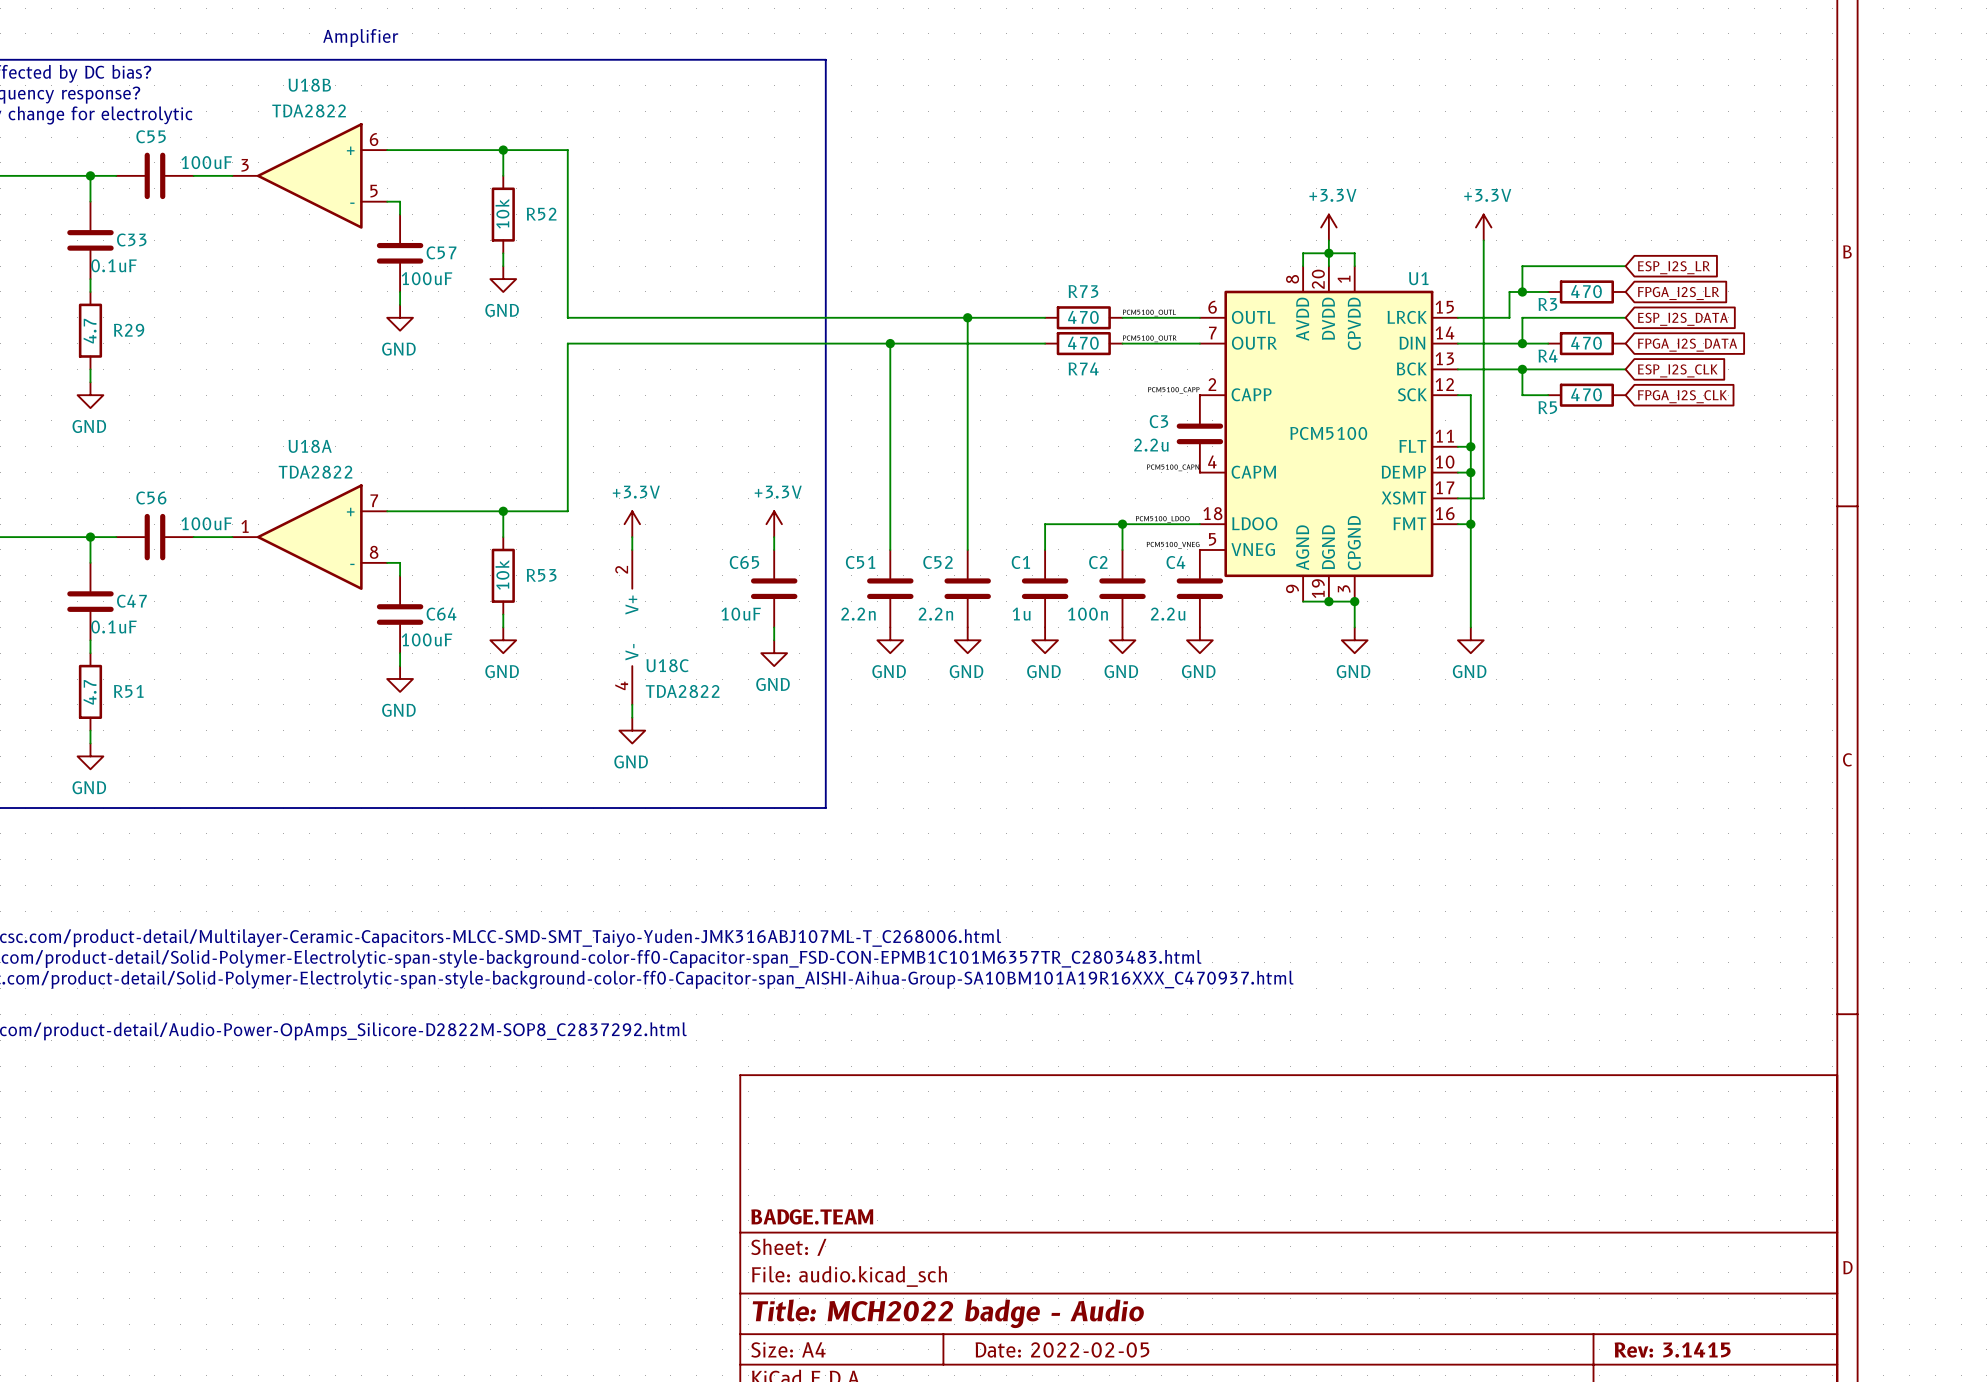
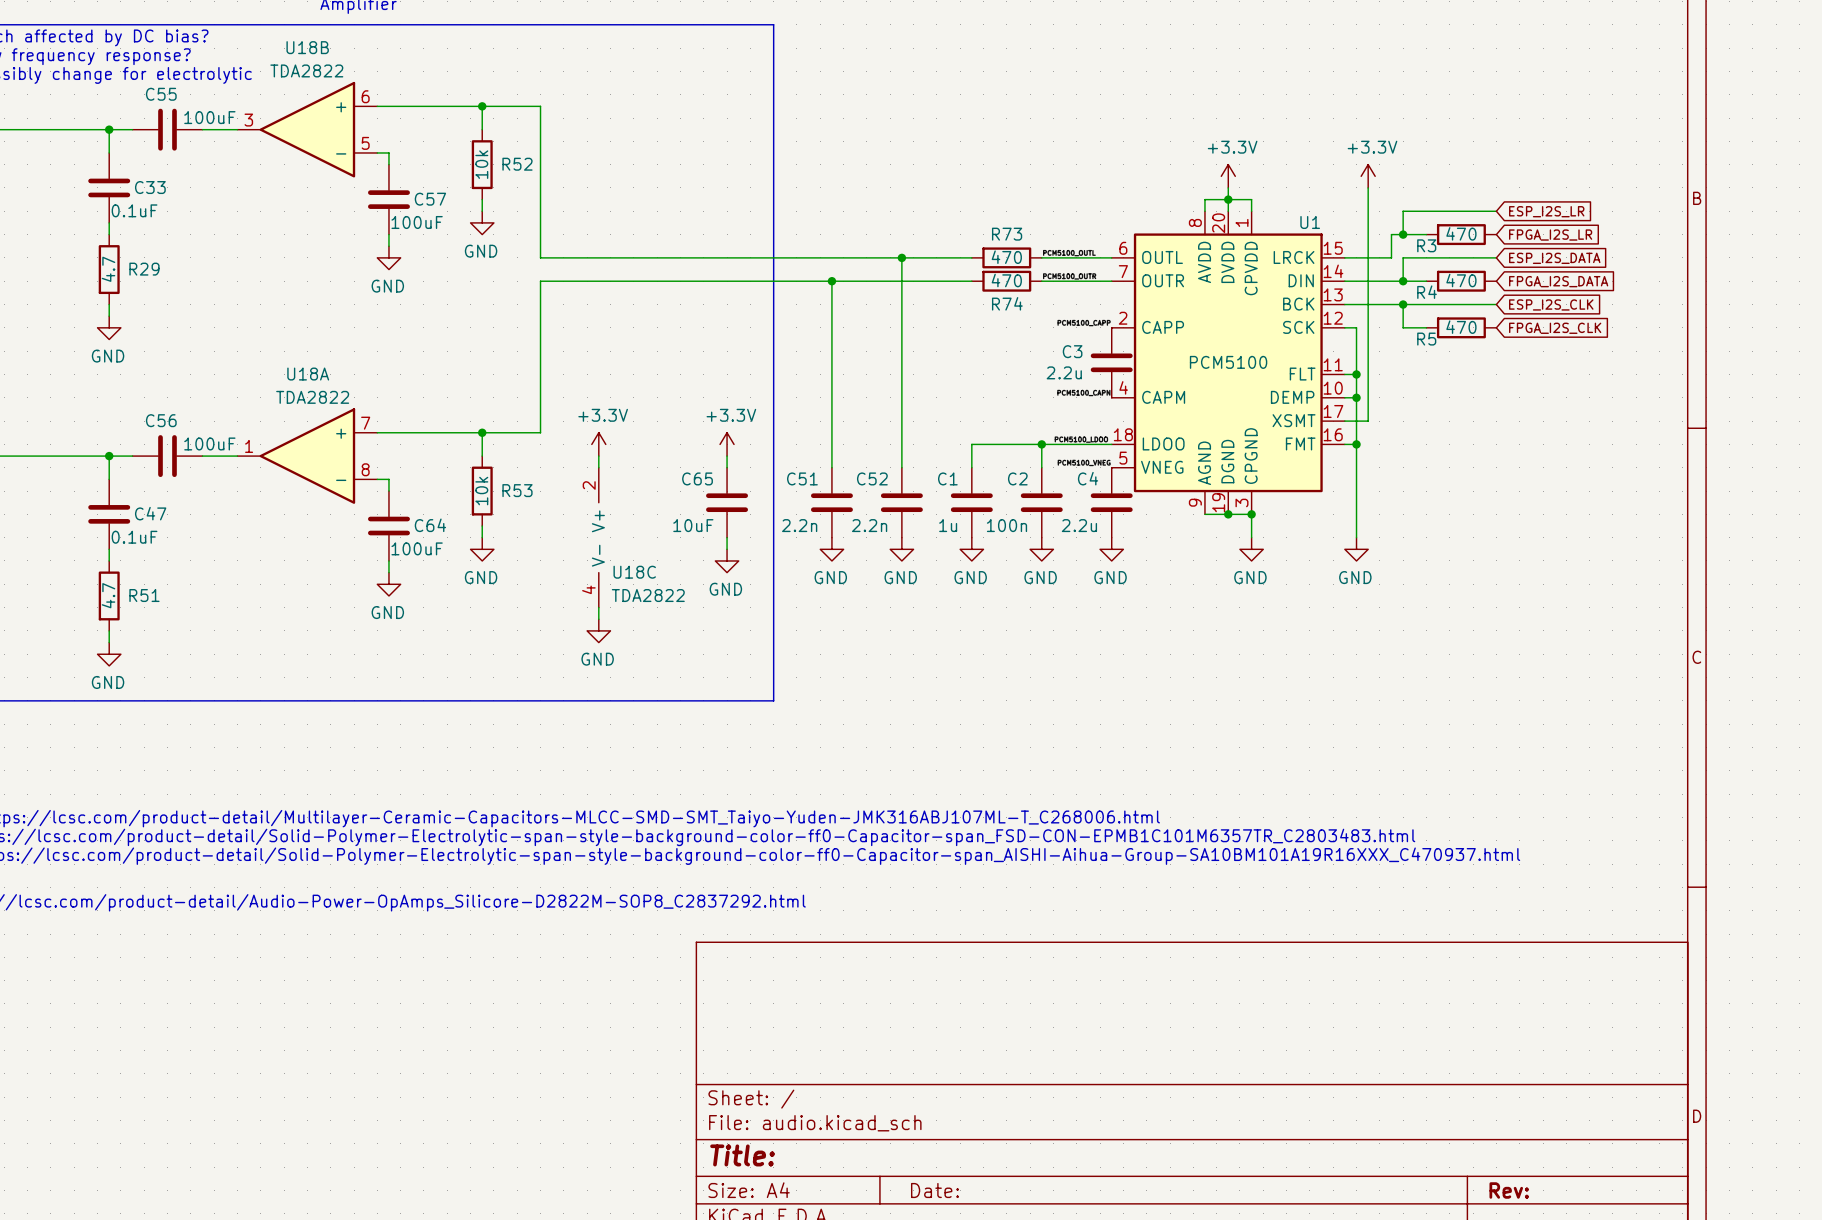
title block: BADGE.TEAM (812, 1216) -> none
title block: Title: MCH2022 badge - Audio (948, 1313) -> Title: (742, 1155)
title block: Date: 2022-02-05 (1062, 1349) -> Date: (934, 1190)
title block: Rev: 3.1415 (1672, 1349) -> Rev: (1509, 1190)

